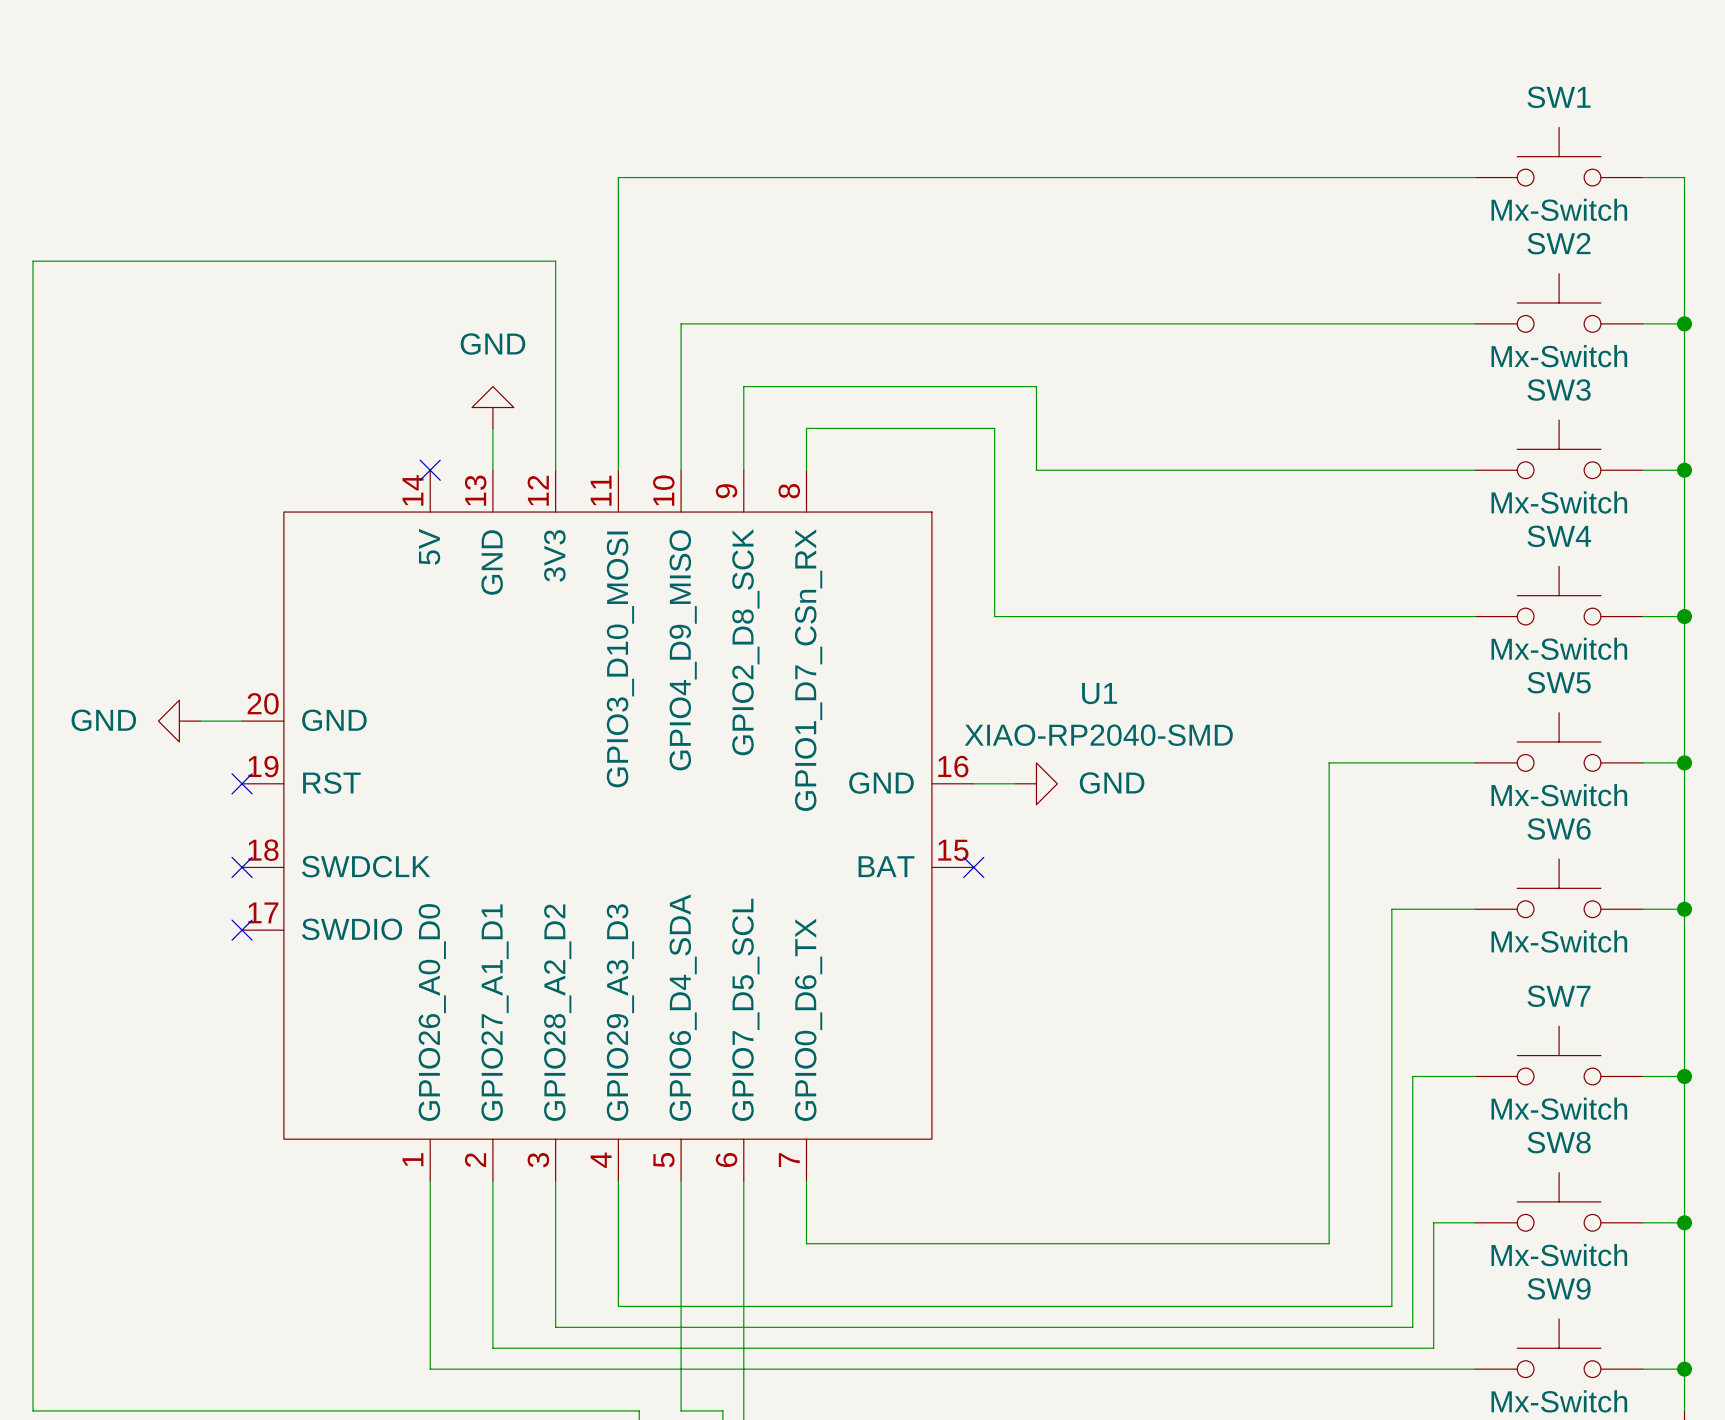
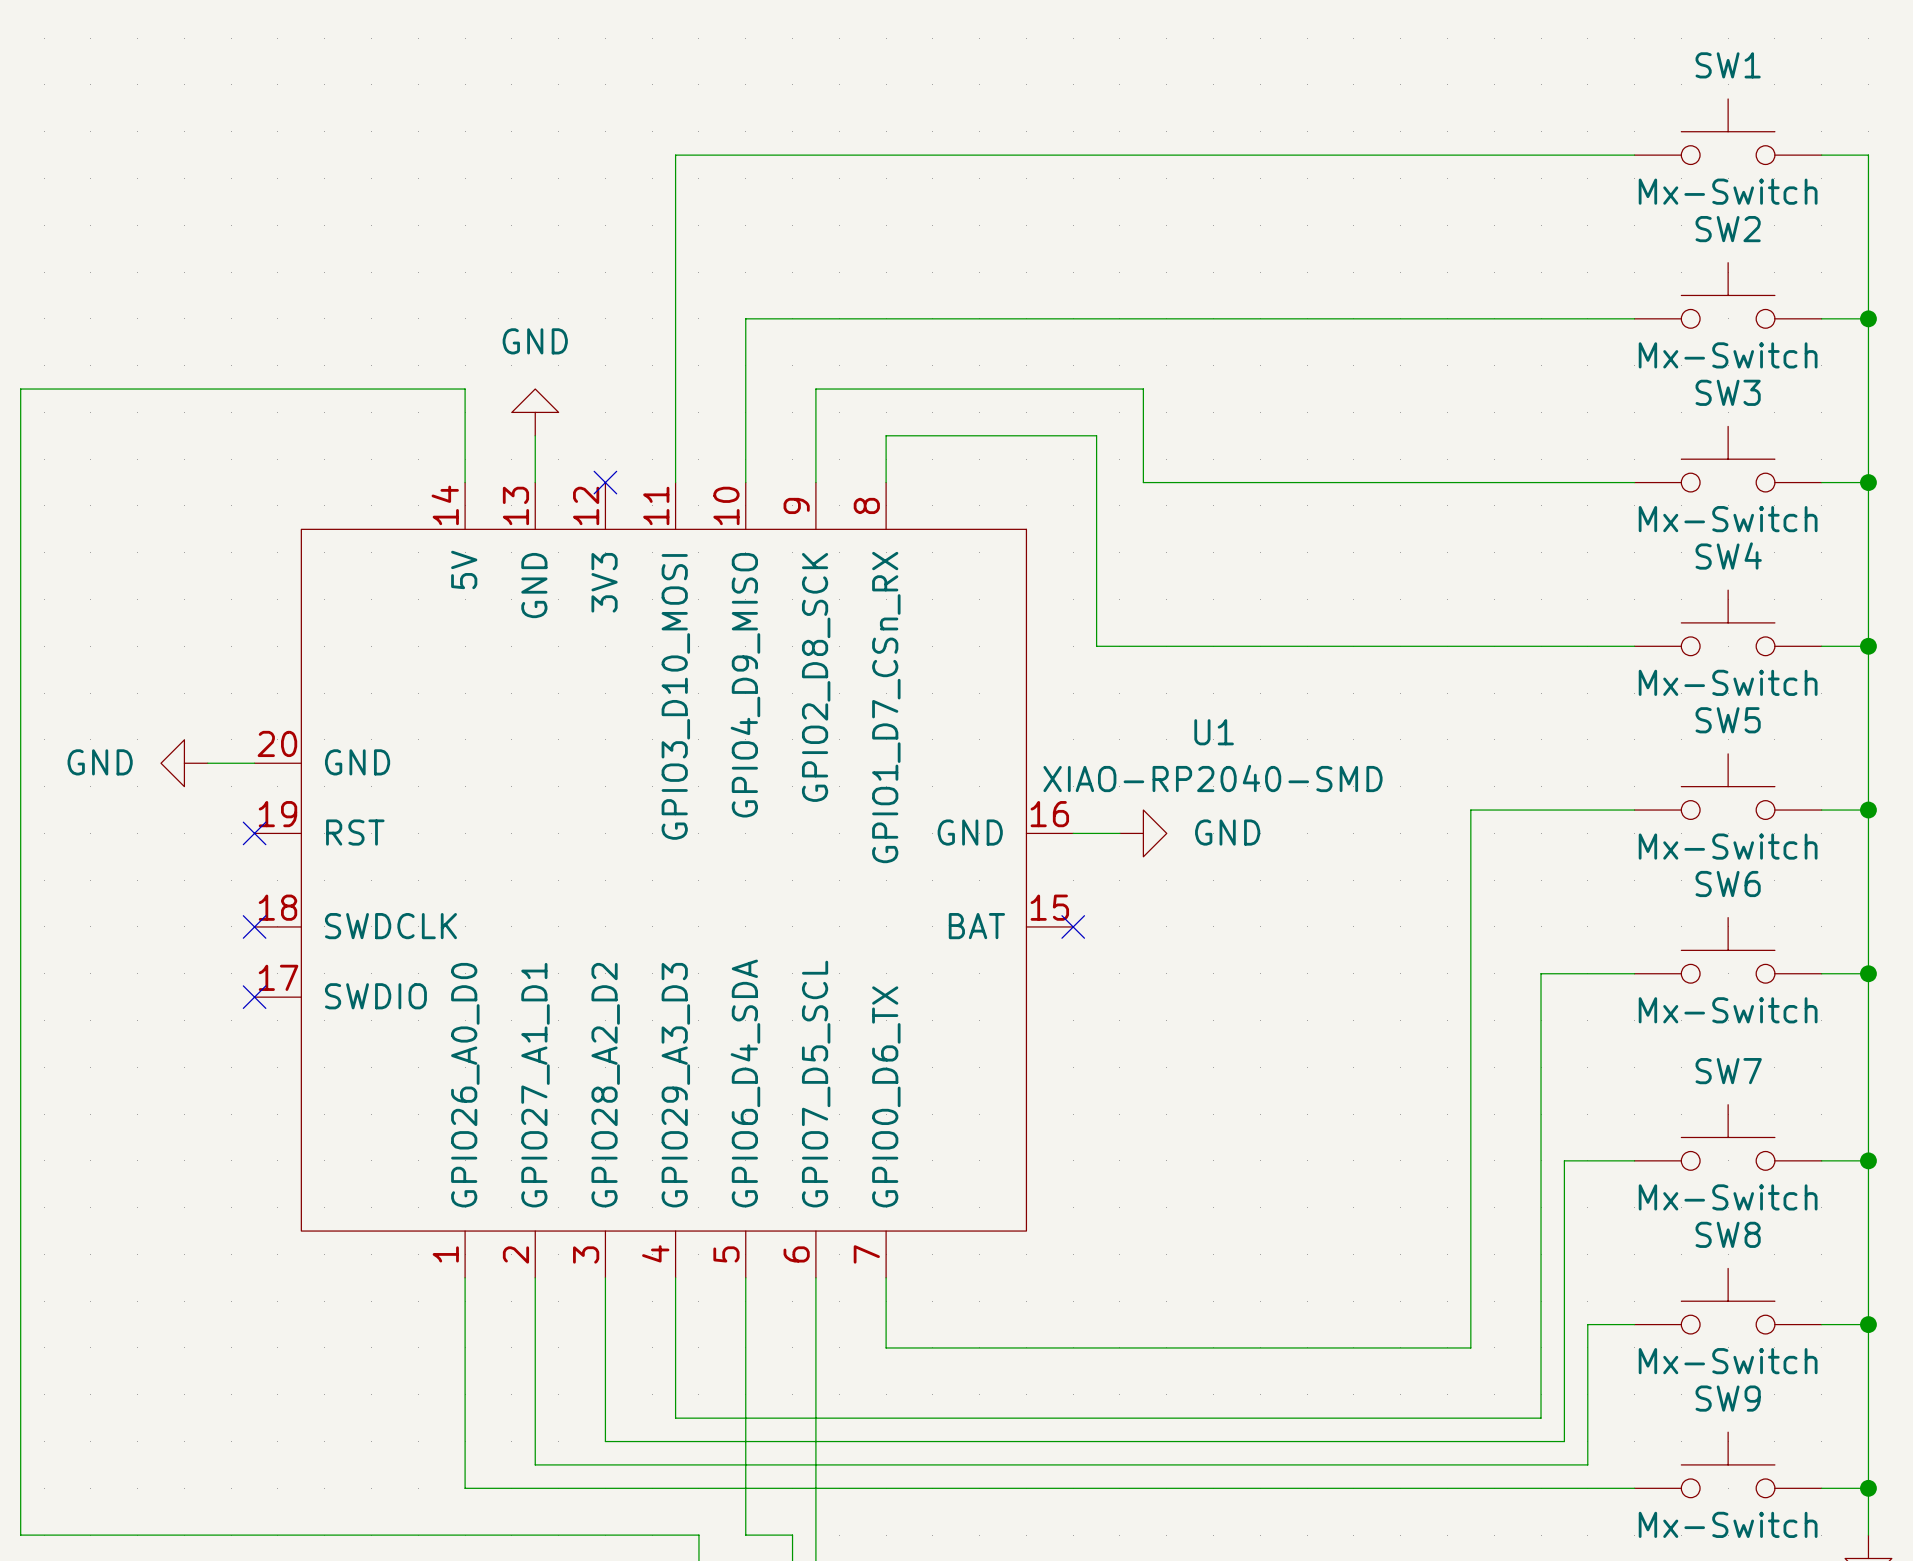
wire: (33, 386) (33, 261) (555, 261) (555, 470) -> (20, 389) (465, 389) (465, 482)
no-connect mark: (430, 470) -> none
no-connect mark: none -> (605, 482)

